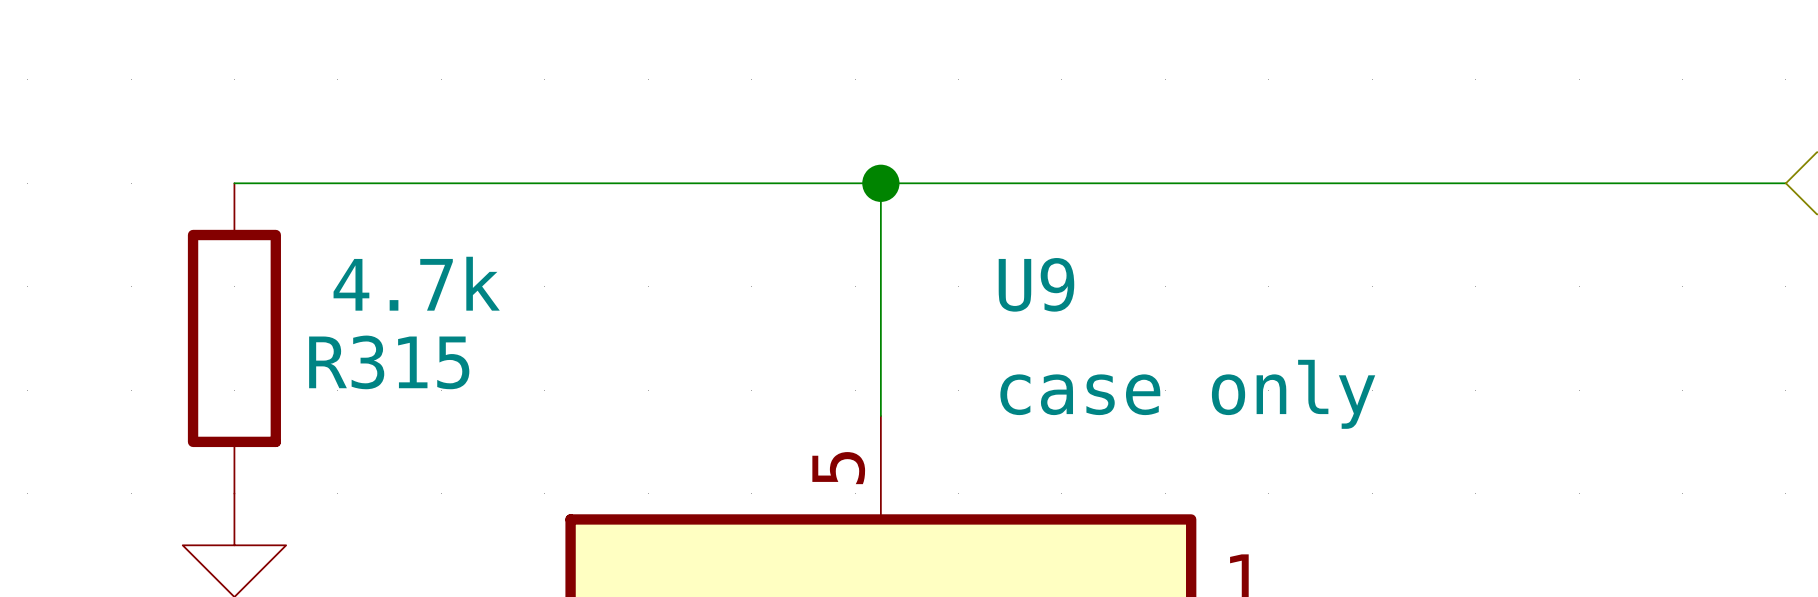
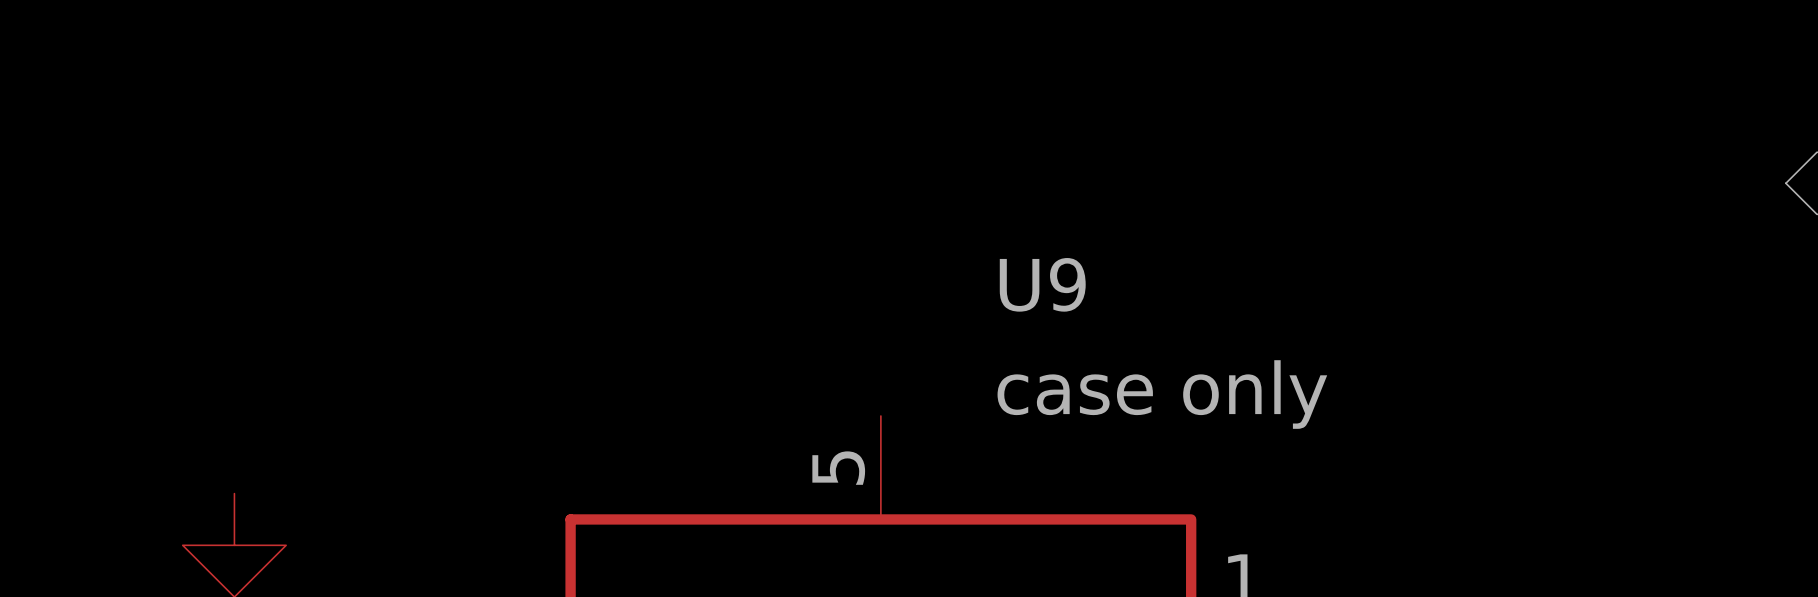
wire: (234, 183) (1785, 183) -> none
wire: (880, 183) (880, 416) -> none
junction: (880, 183) -> none
R315: 4.7k (234, 338) -> none

